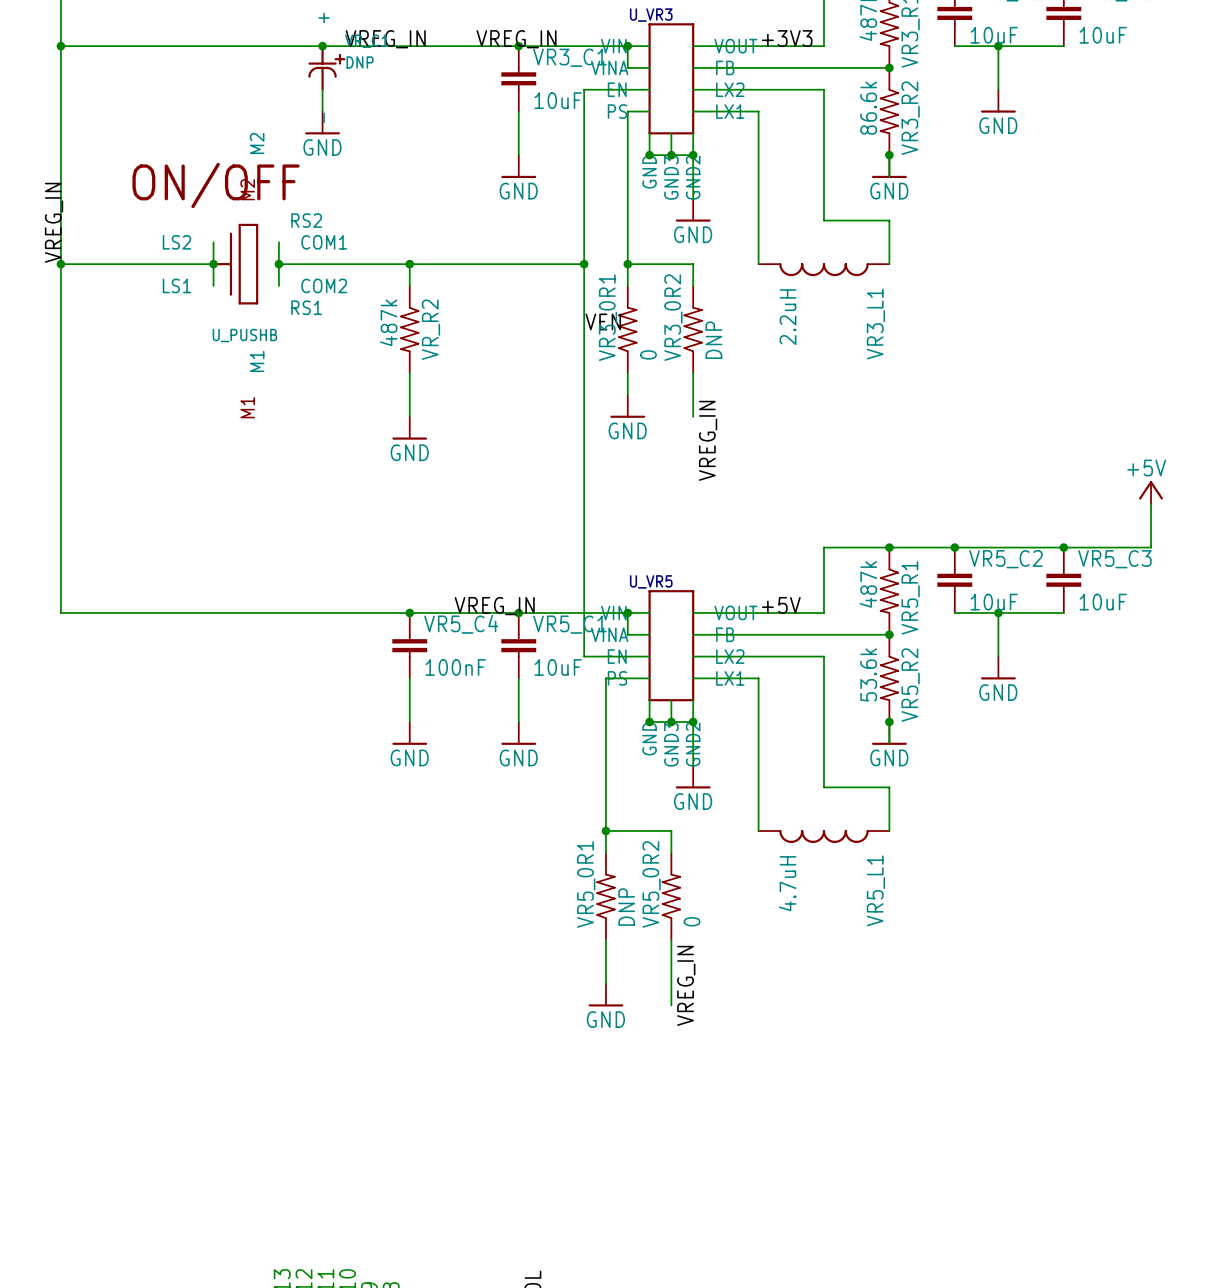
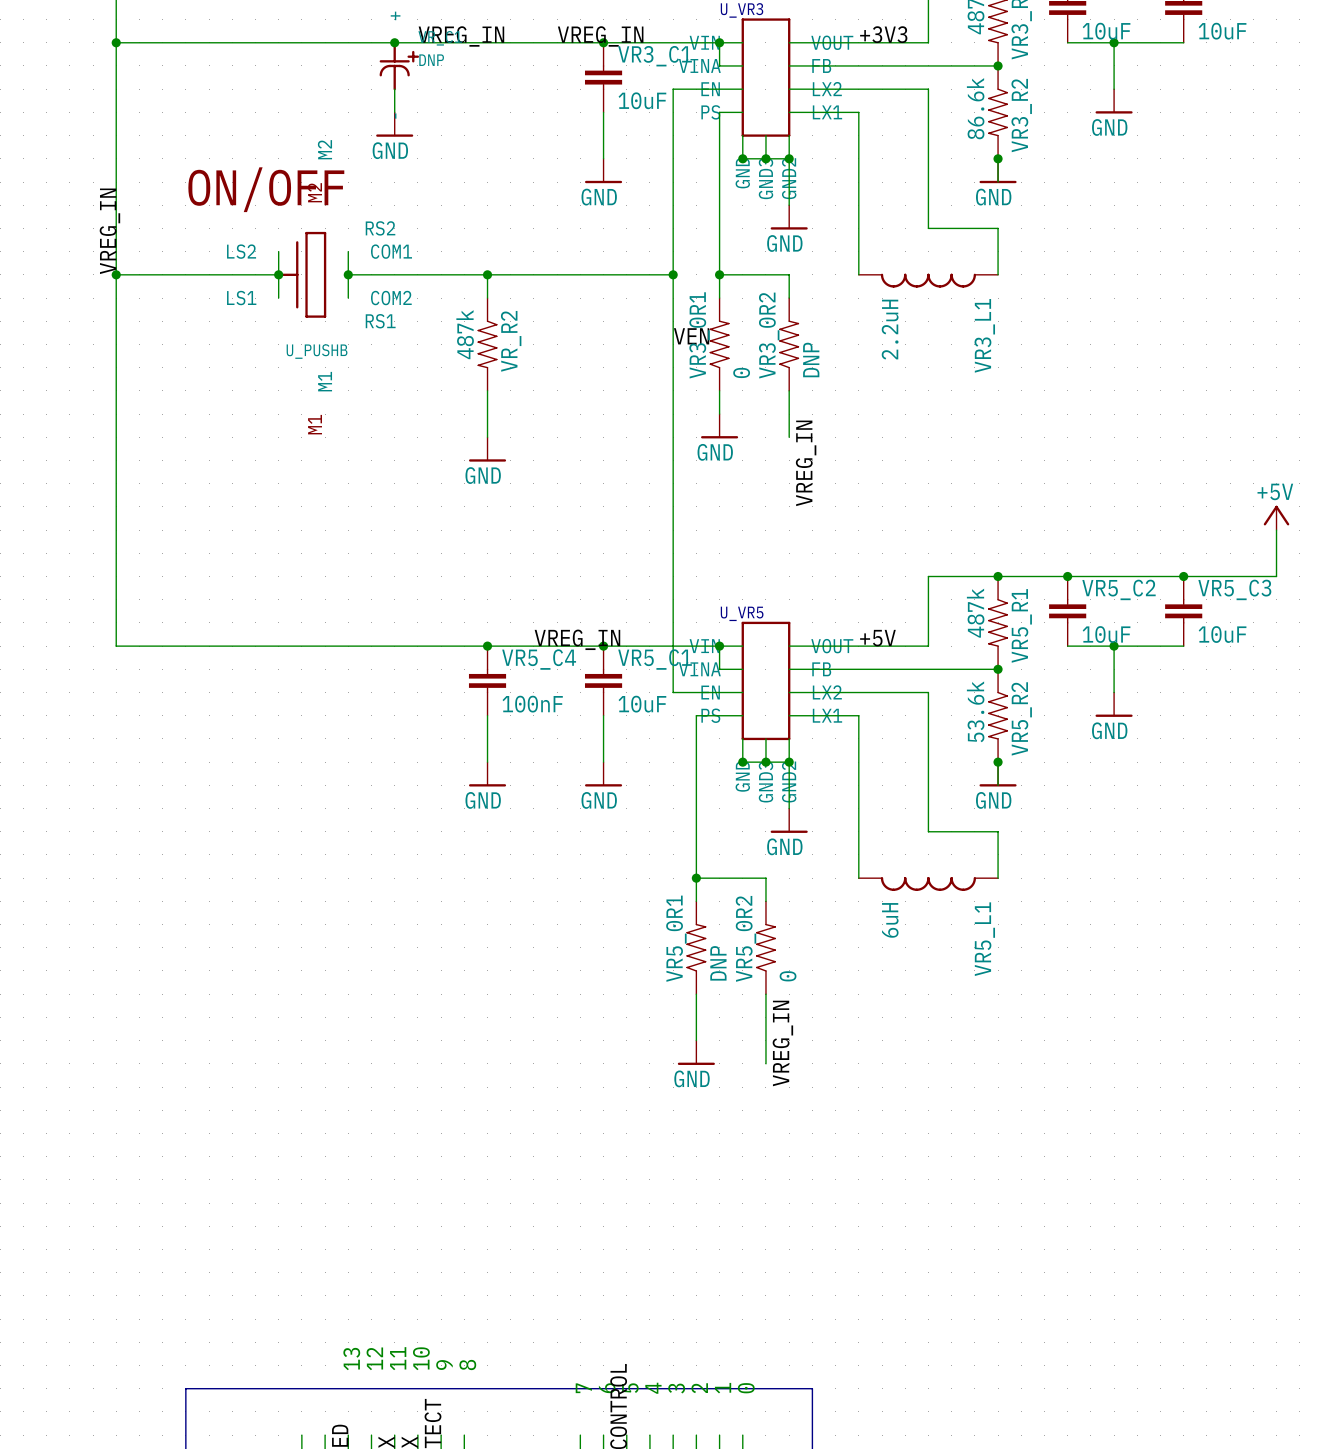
VR5_L1 value: 4.7uH (787, 883) -> 6uH (890, 920)

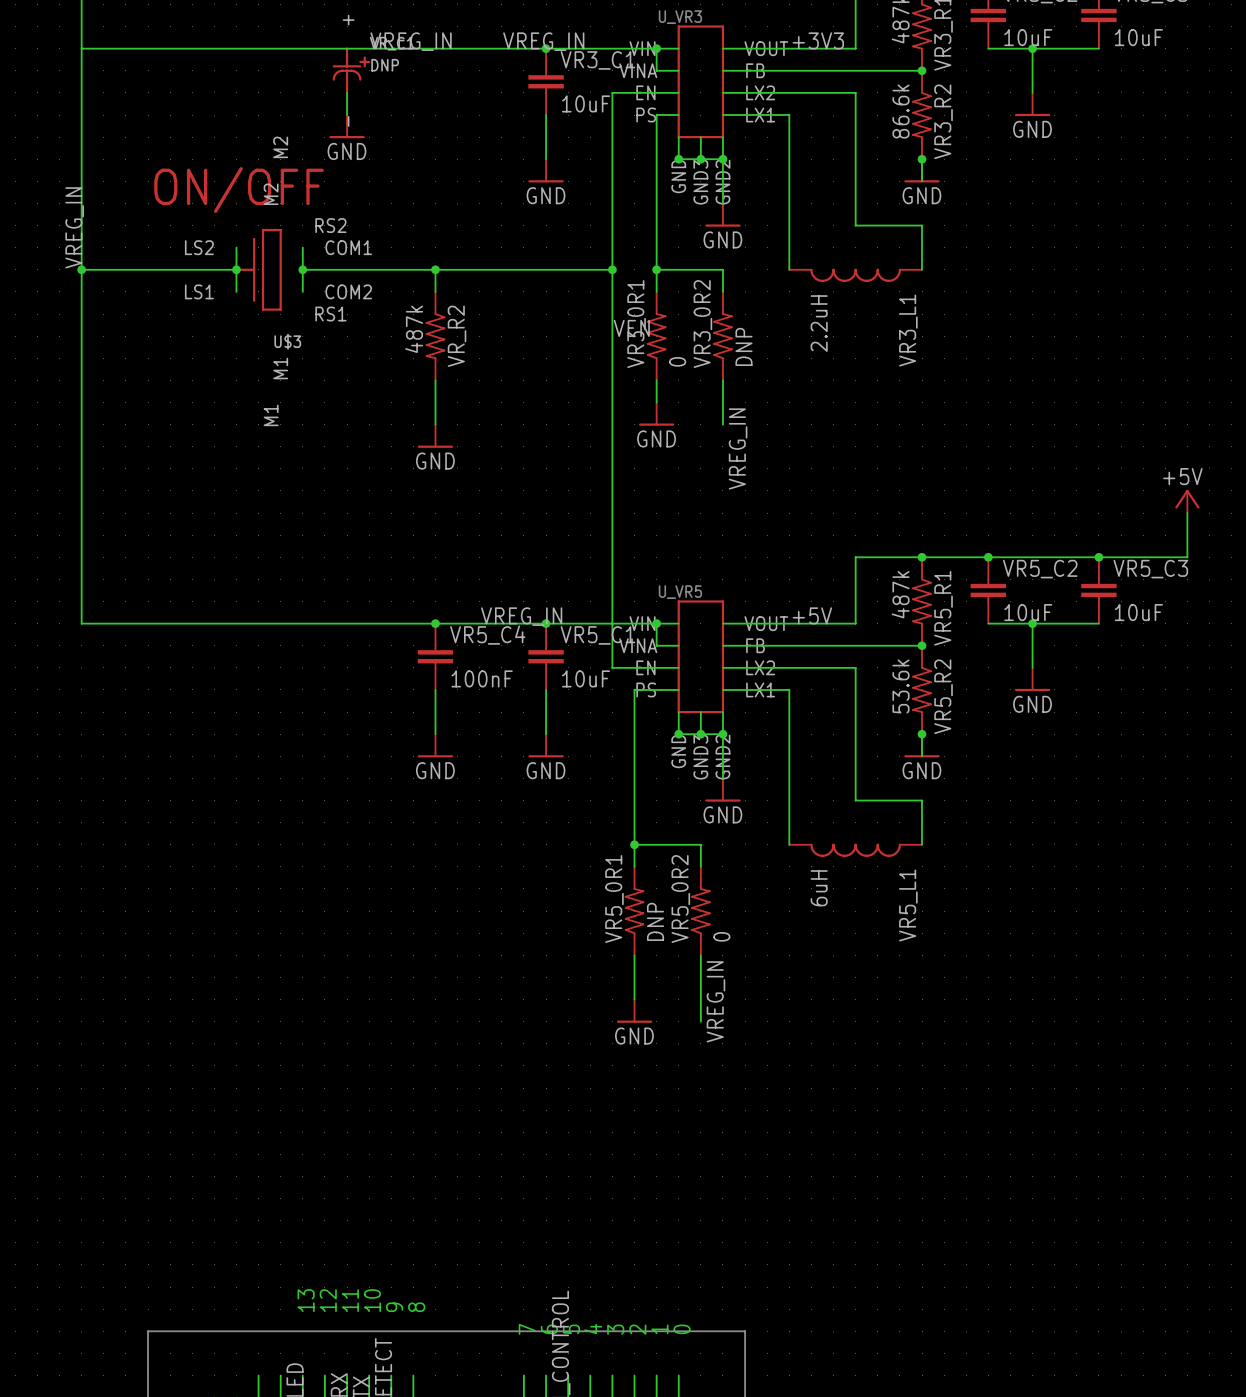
junction: (116, 42) -> none
junction: (394, 42) -> none
U_PUSHB name: U_PUSHB (317, 351) -> U$3 (287, 341)

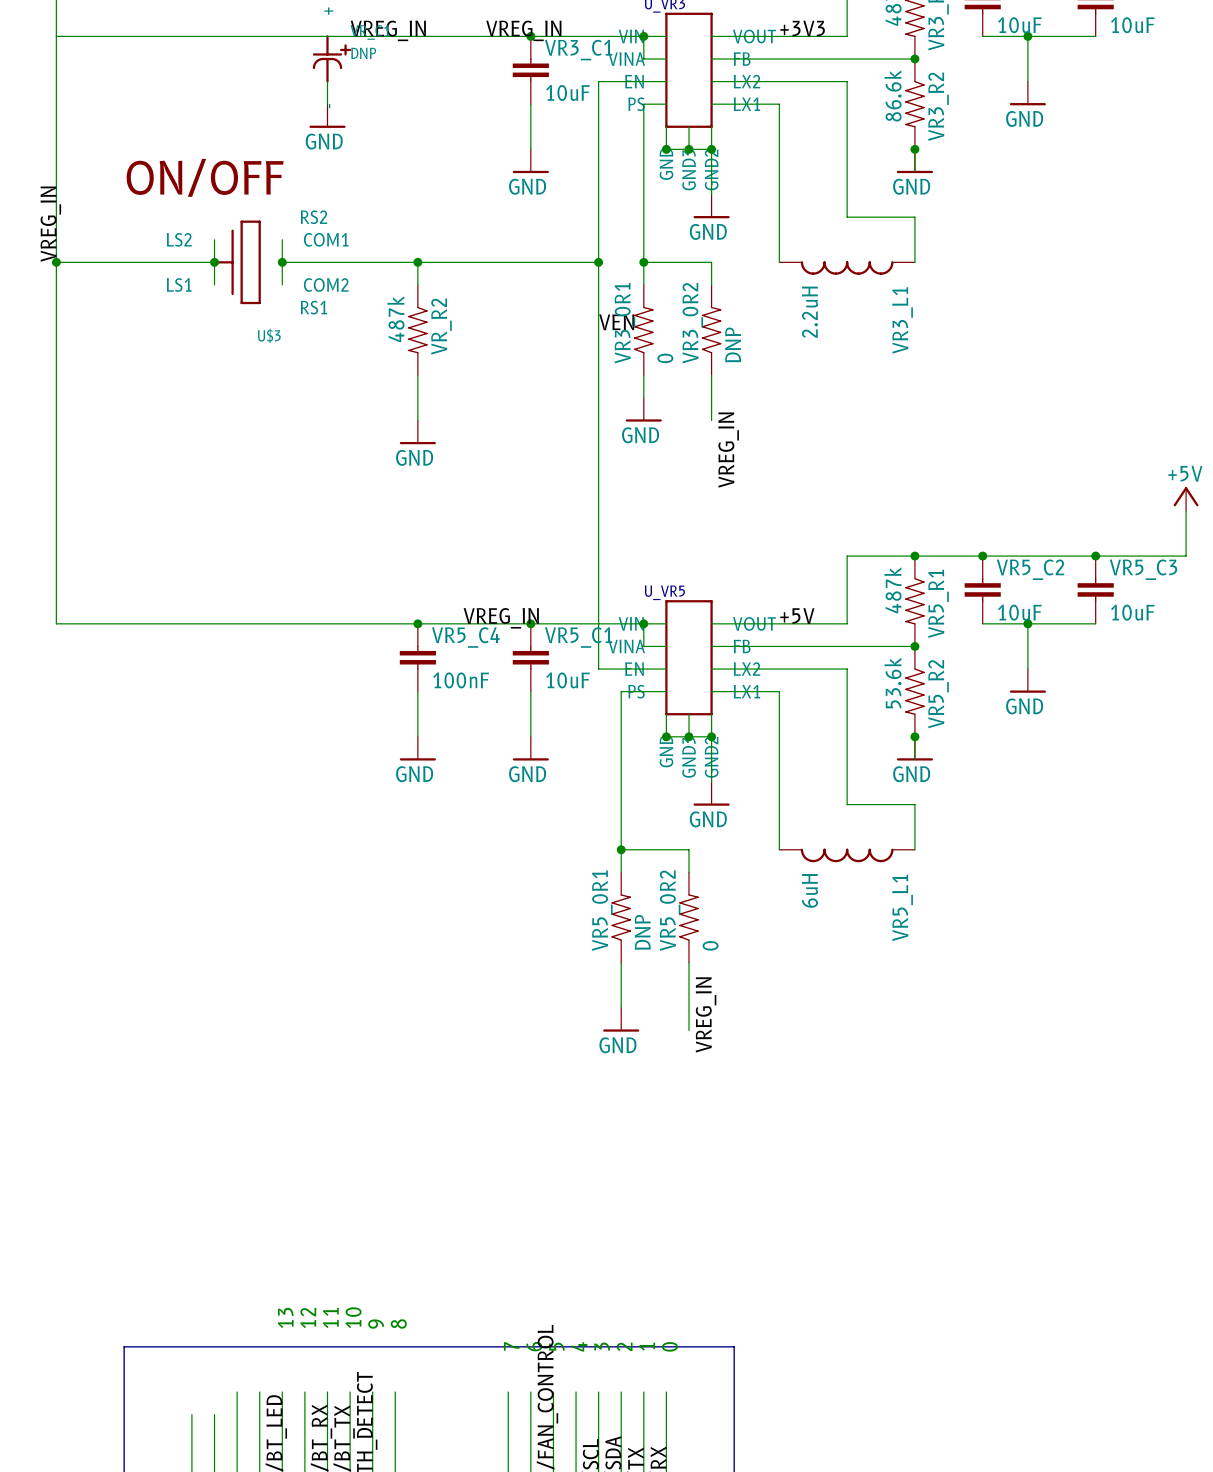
U$3 pin name: M2 (280, 147) -> none
U$3 pin number: M2 (271, 194) -> none
U$3 pin name: M1 (280, 368) -> none
U$3 pin number: M1 (271, 415) -> none

